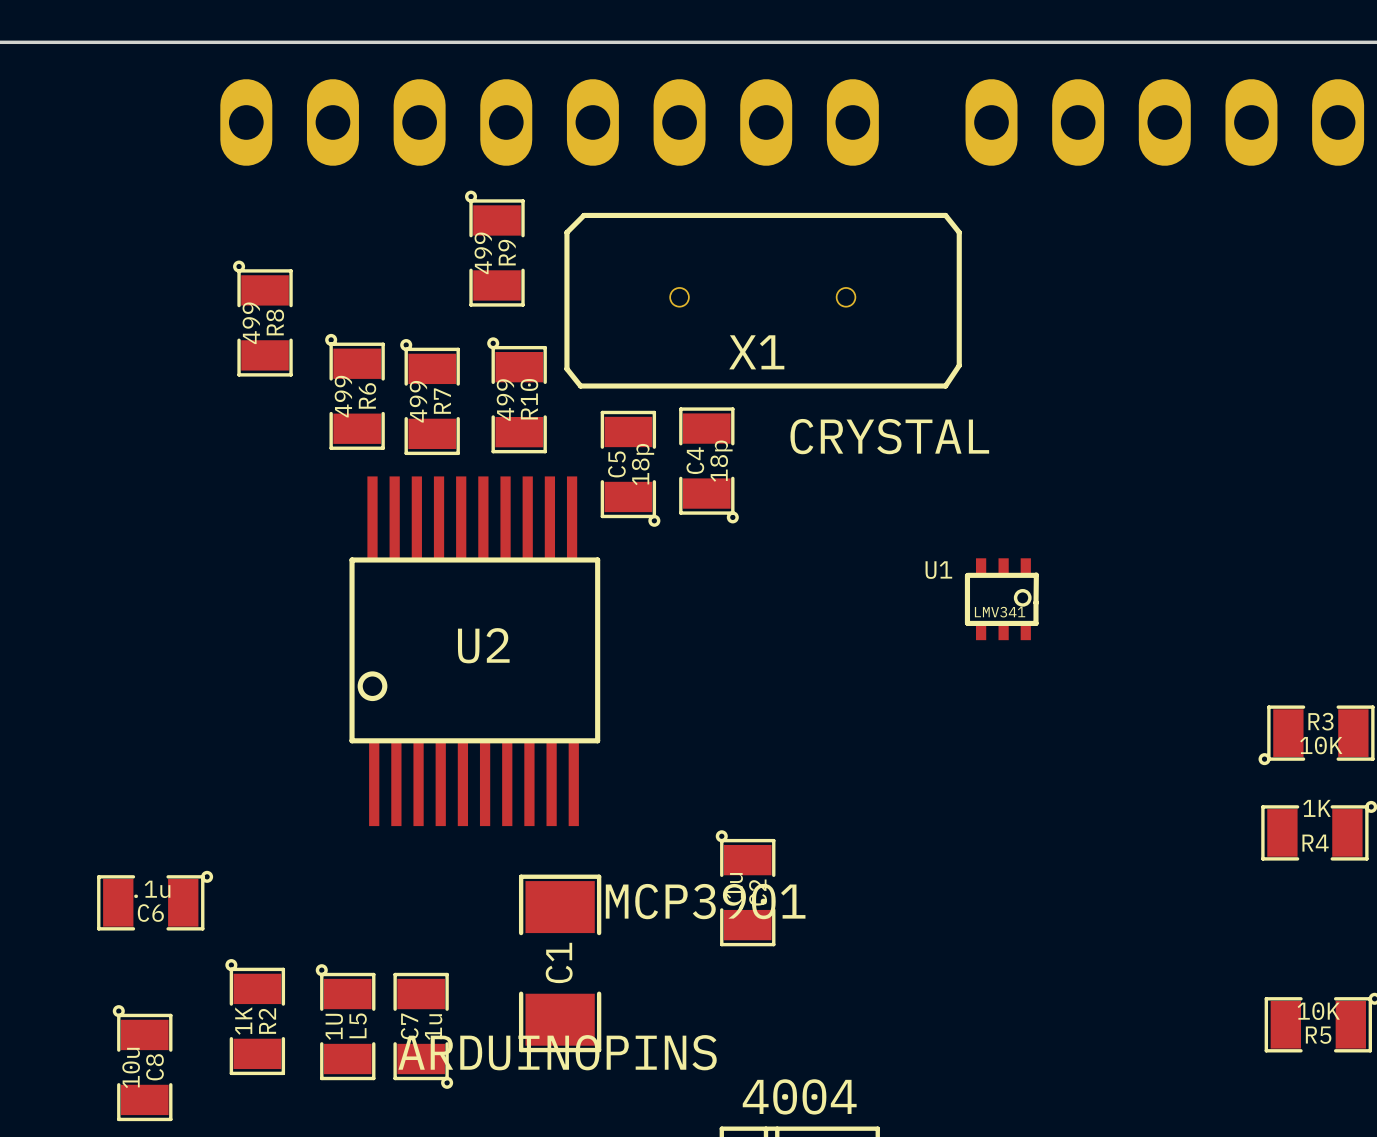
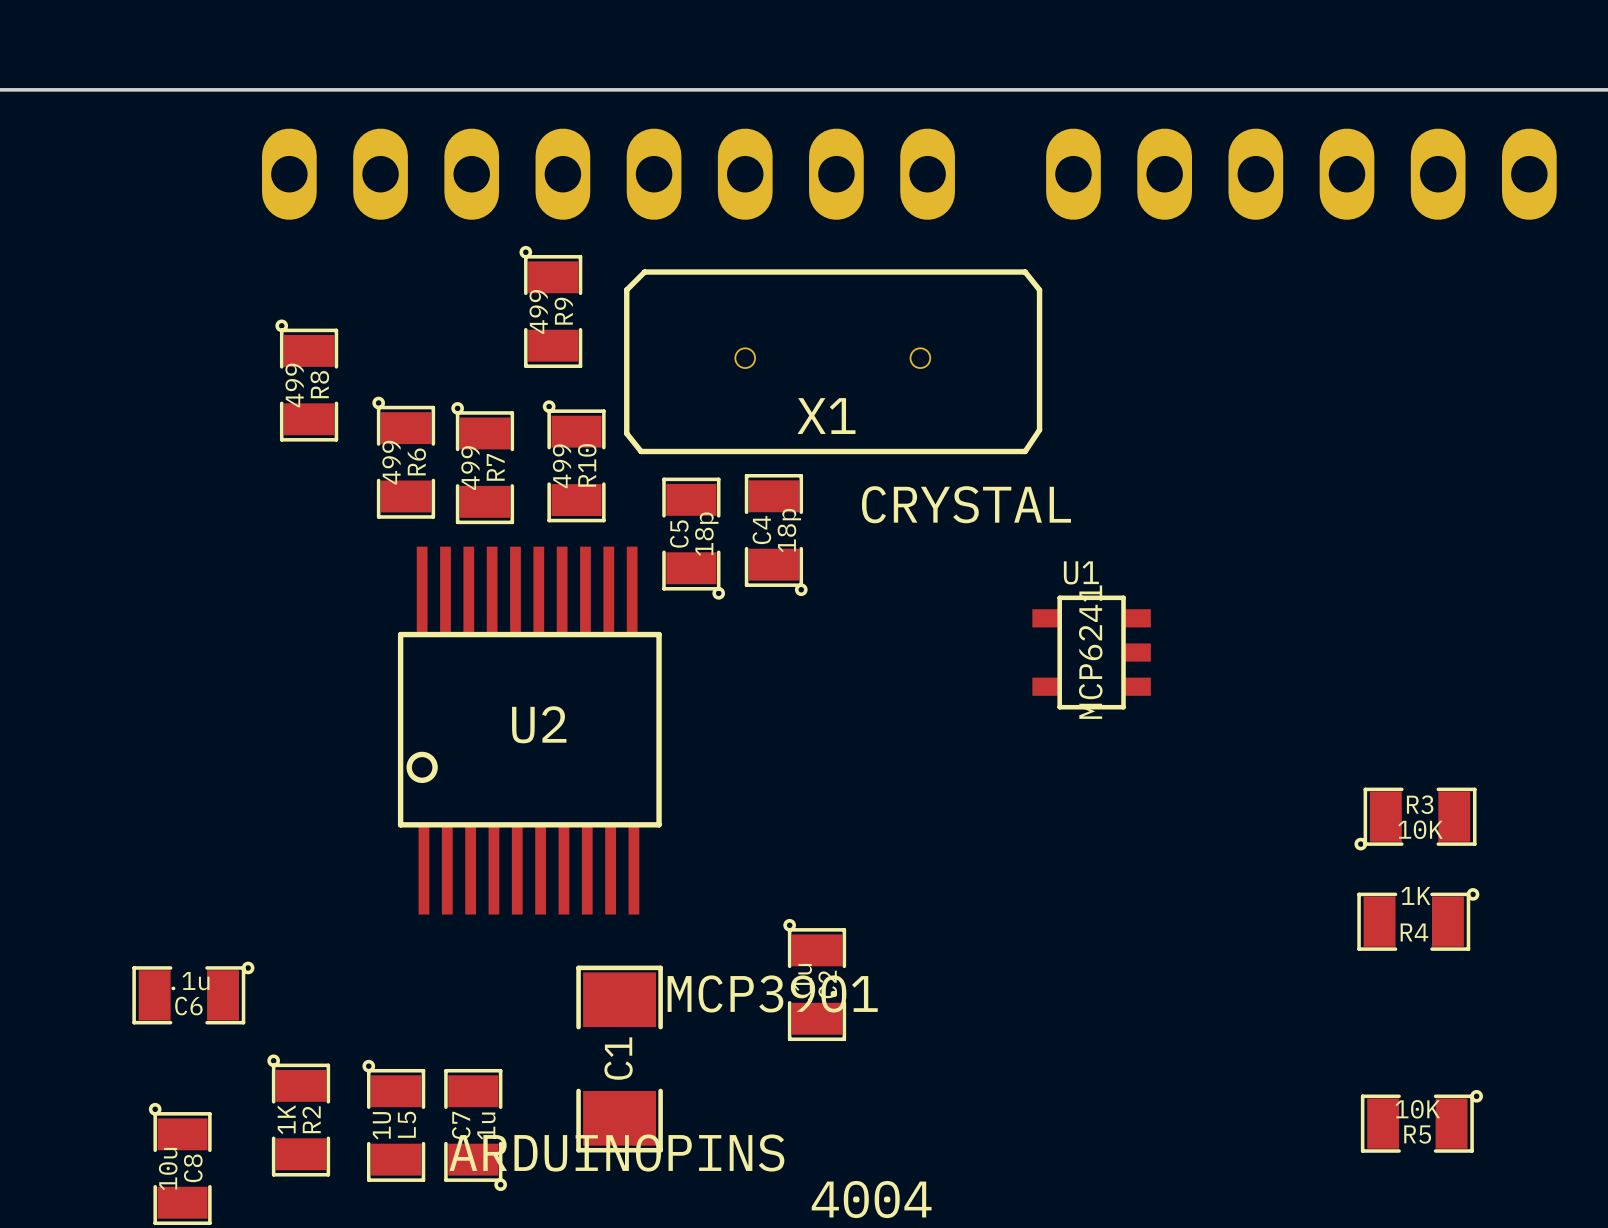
U1 footprint: [964, 558, 1039, 641] -> [1032, 595, 1151, 710]
U1 name position: U1 (938, 570) -> U1 (1081, 572)
U1 value: LMV341 (1000, 612) -> MCP6241 (1090, 652)

